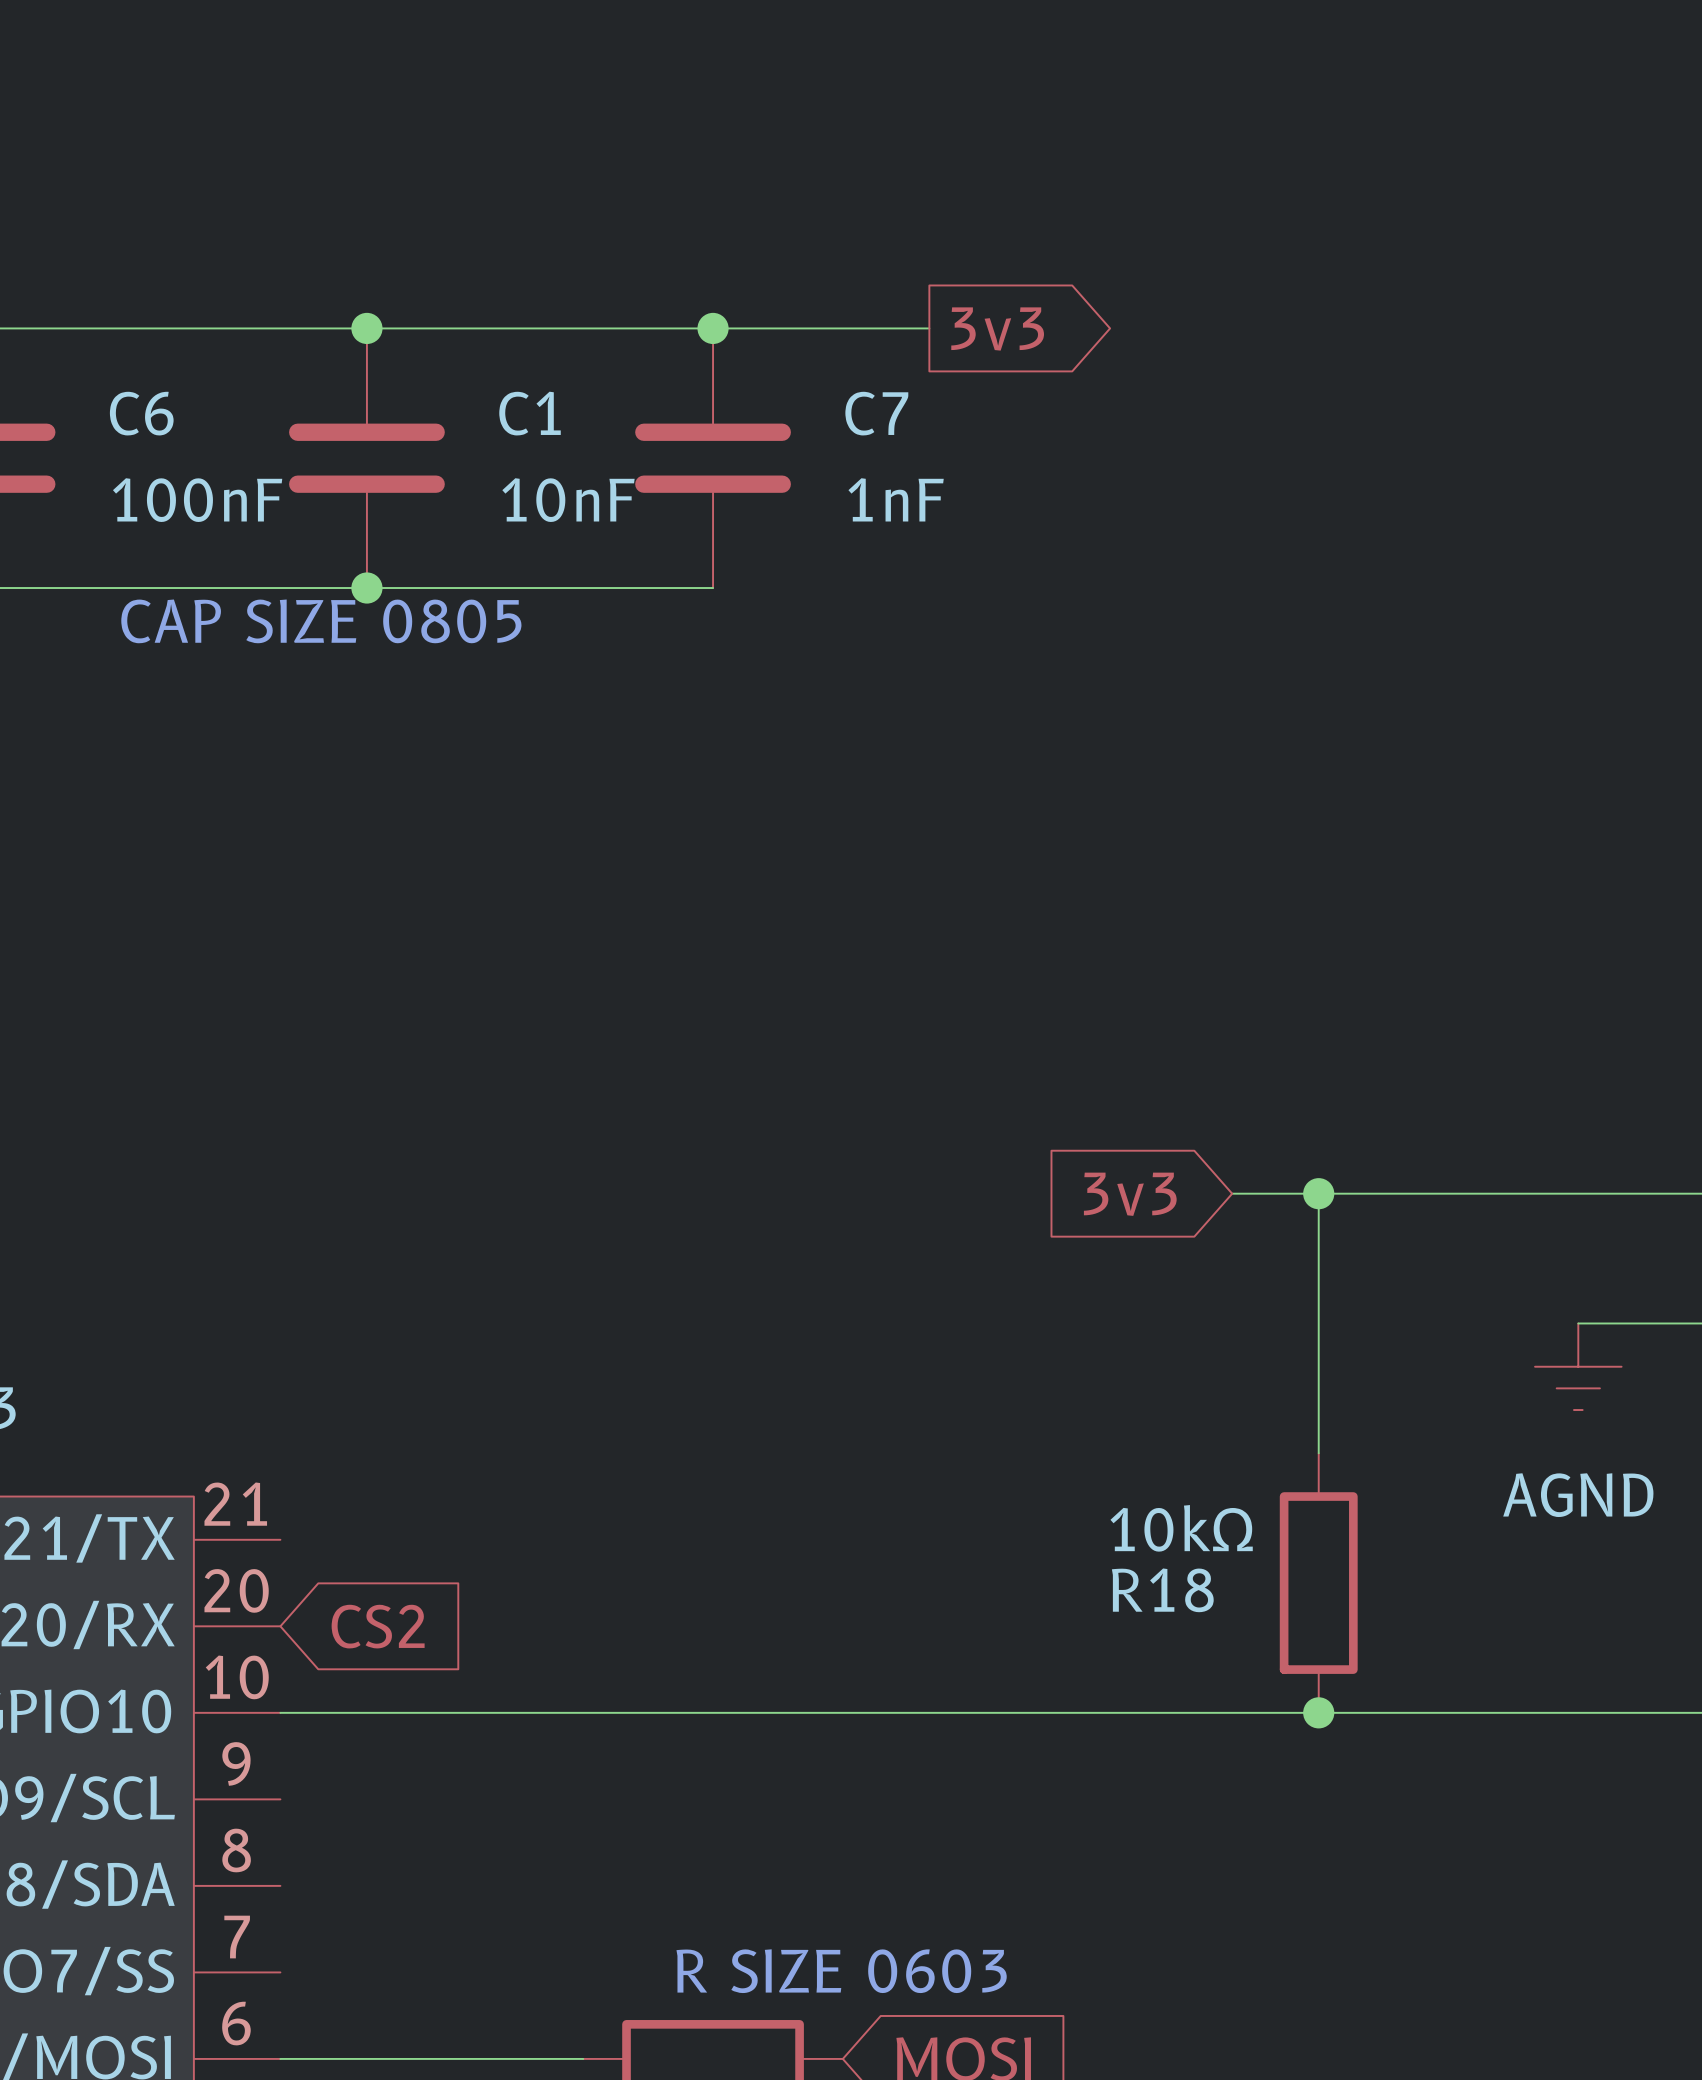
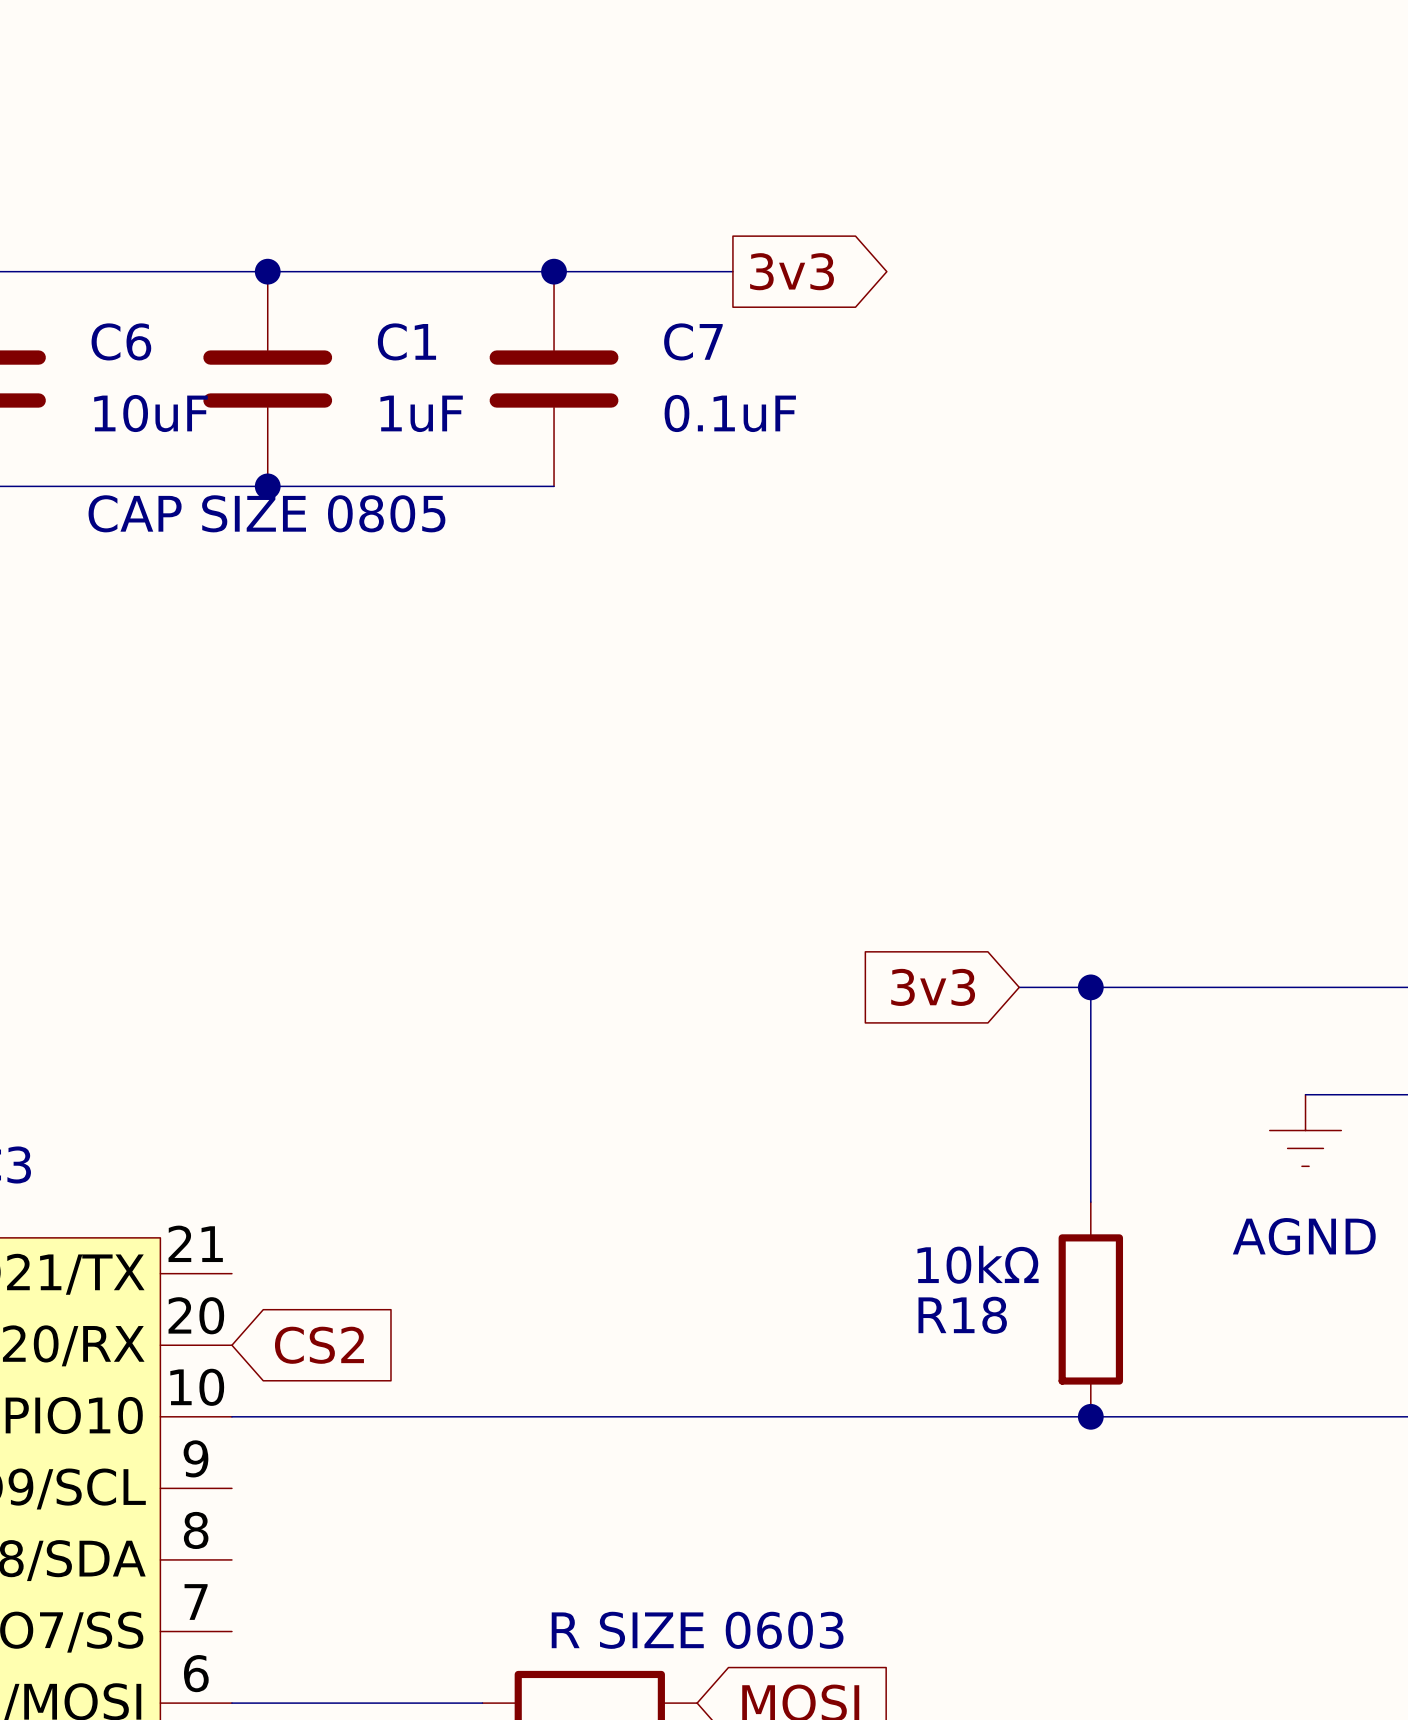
junction position: (366, 328) -> (267, 271)
junction position: (713, 328) -> (554, 271)
wire: (886, 328) (929, 328) -> none
global label position: 3v3 (997, 329) -> 3v3 (792, 271)
C1 position: (366, 458) -> (267, 379)
C7 position: (713, 458) -> (554, 379)
C7 value: 1nF (896, 499) -> 0.1uF (730, 413)
C6 value: 100nF (197, 500) -> 10uF (150, 413)
C1 value: 10nF (568, 500) -> 1uF (421, 413)
junction position: (366, 588) -> (267, 486)
wire: (669, 588) (713, 588) -> none

